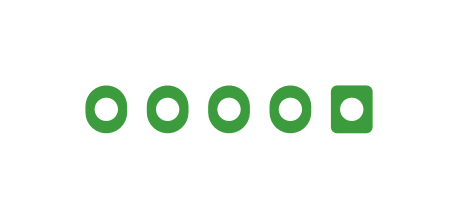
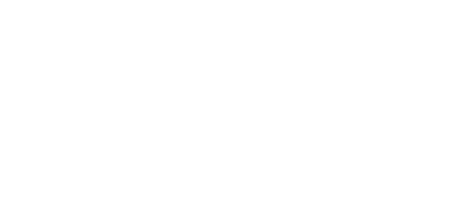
part: (229, 109) -> none

